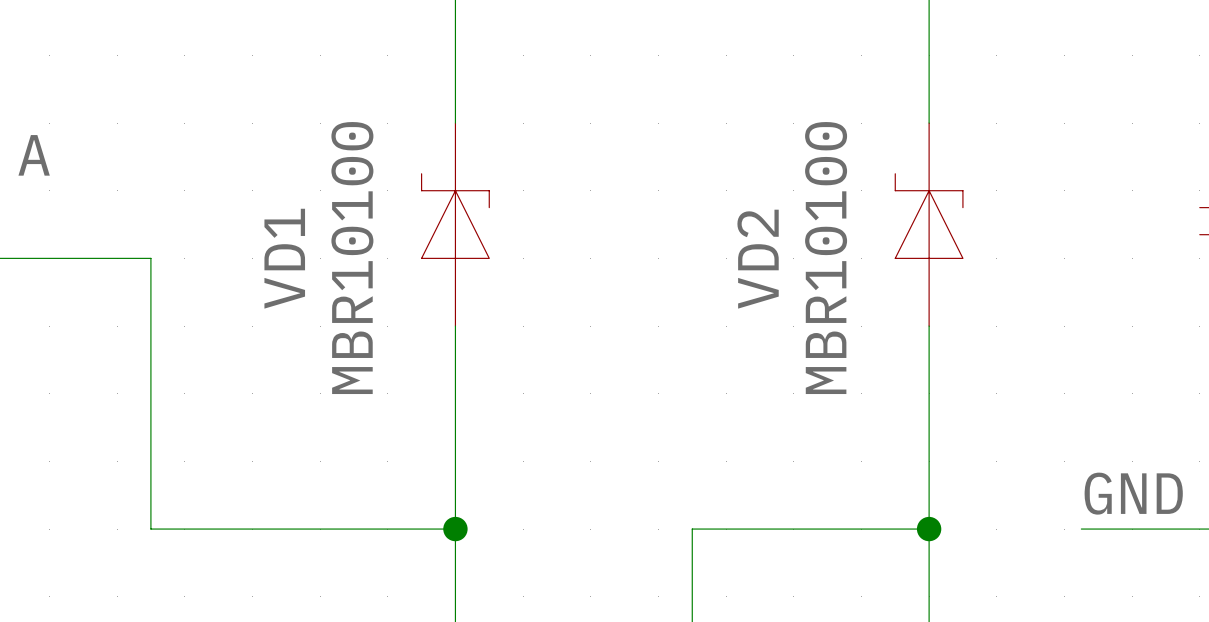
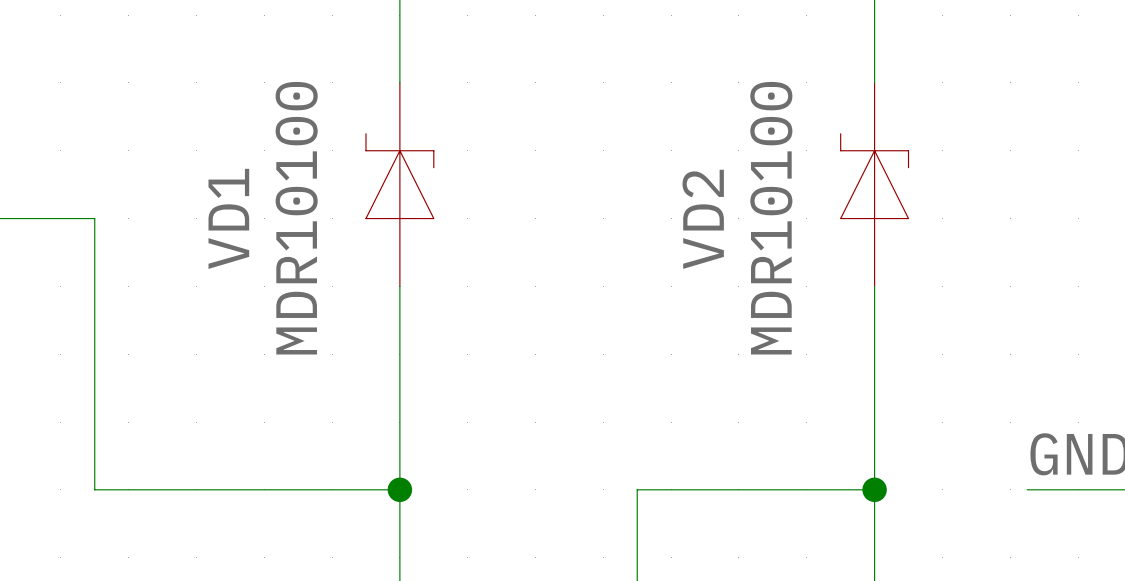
VD1 value: MBR10100 (352, 258) -> MDR10100 (296, 218)
VD2 value: MBR10100 (826, 258) -> MDR10100 (771, 218)

